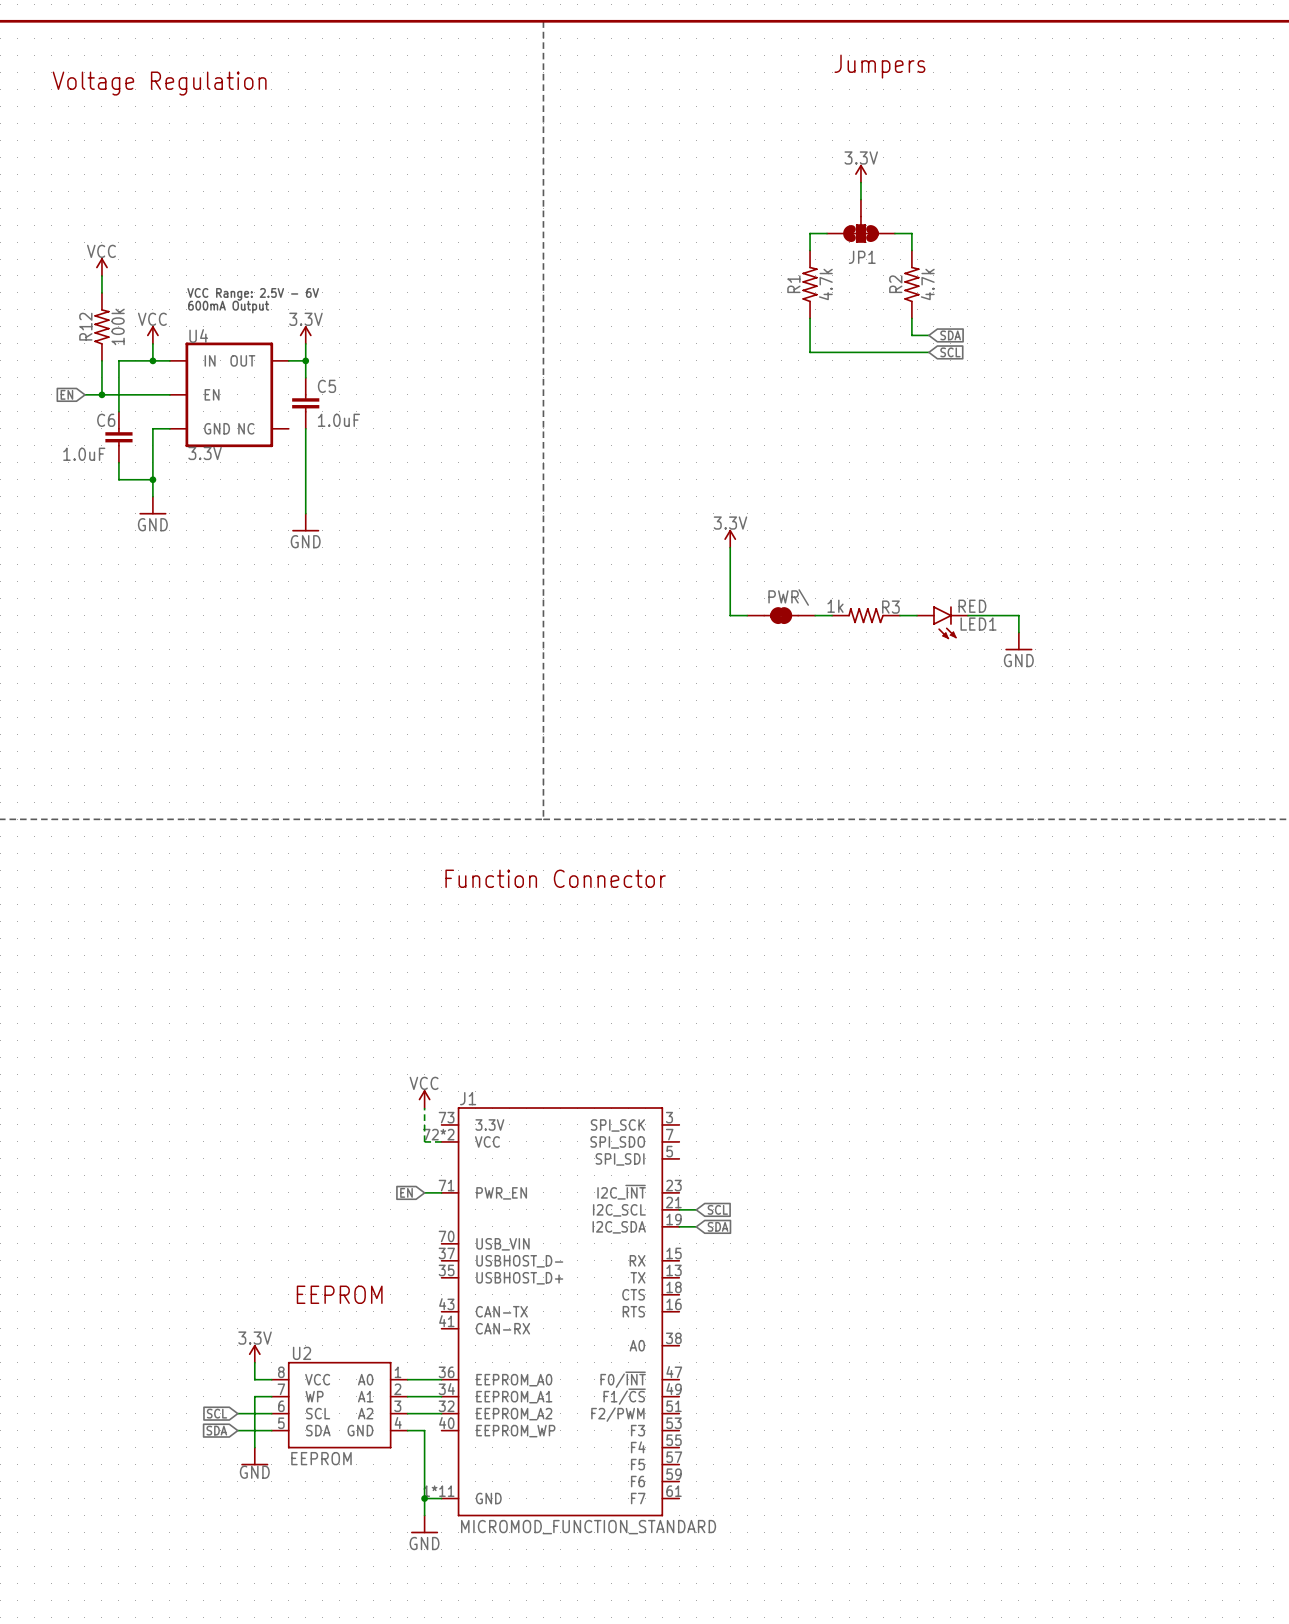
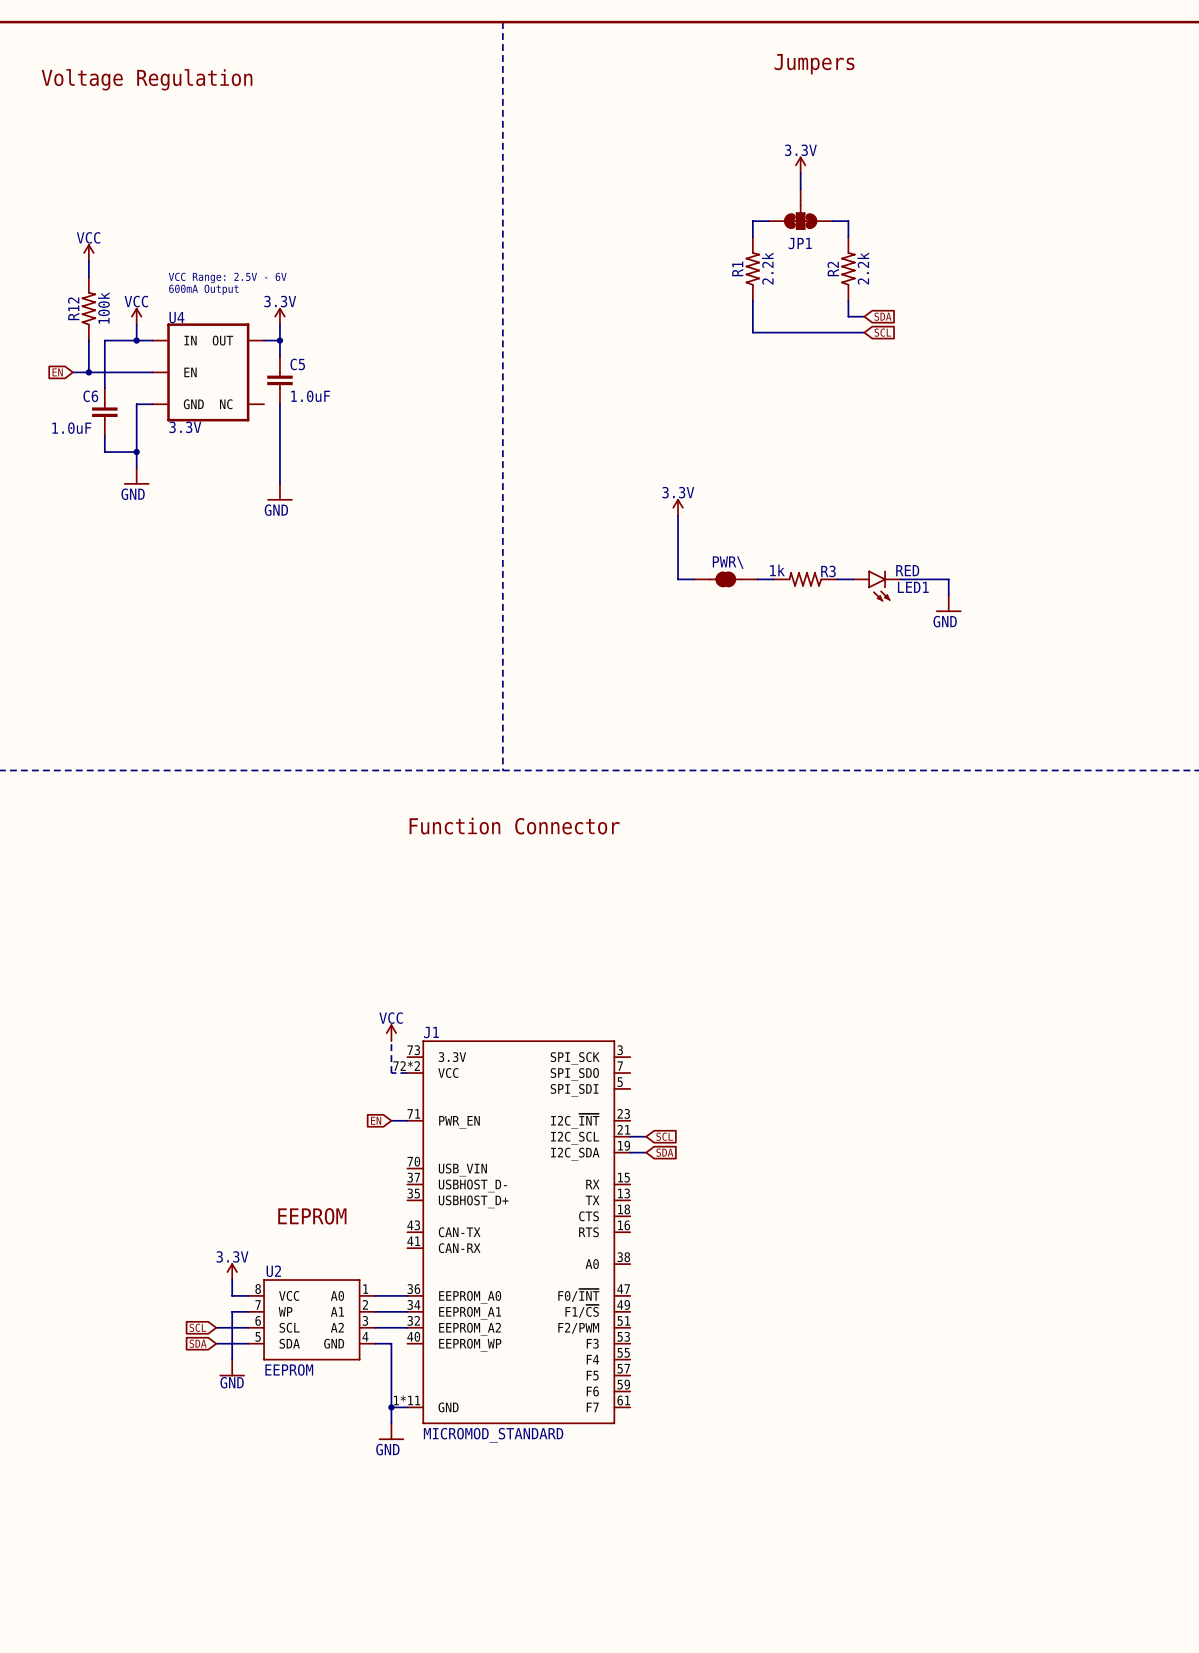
R1 value: 4.7k (825, 284) -> 2.2k (767, 268)
R2 value: 4.7k (927, 284) -> 2.2k (863, 268)
J1 value: MICROMOD_FUNCTION_STANDARD (588, 1527) -> MICROMOD_STANDARD (493, 1435)

